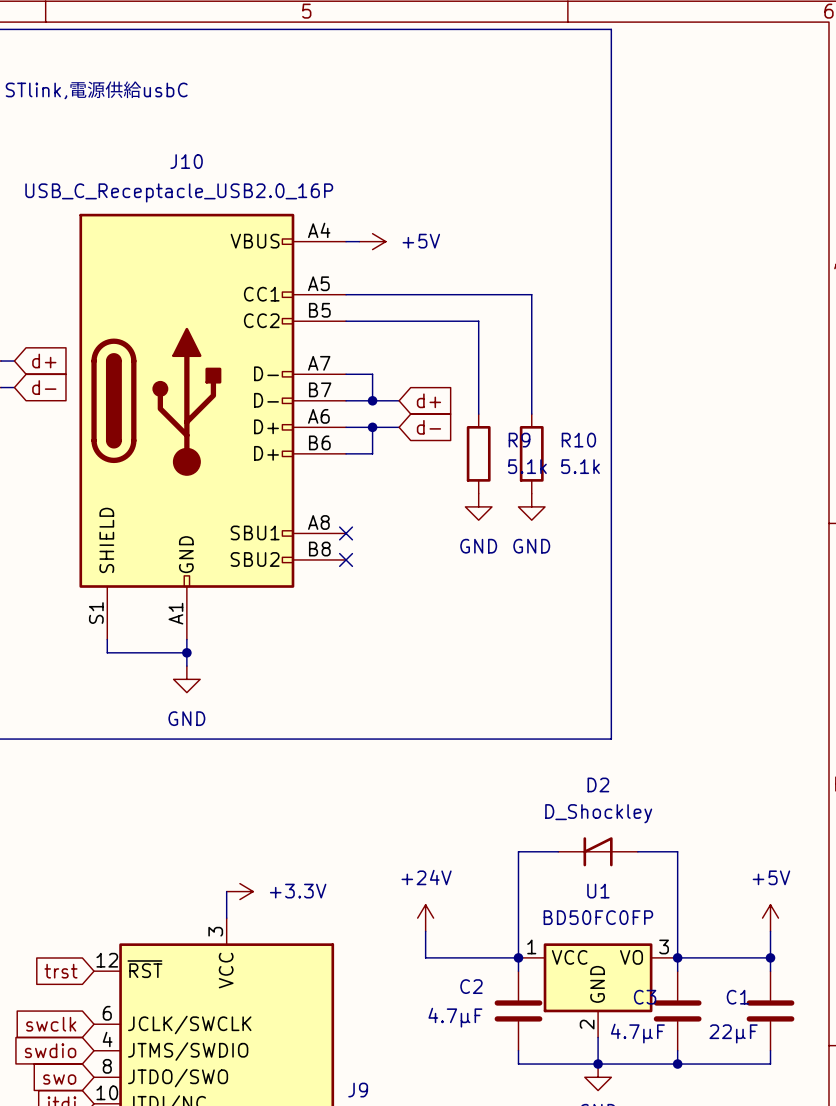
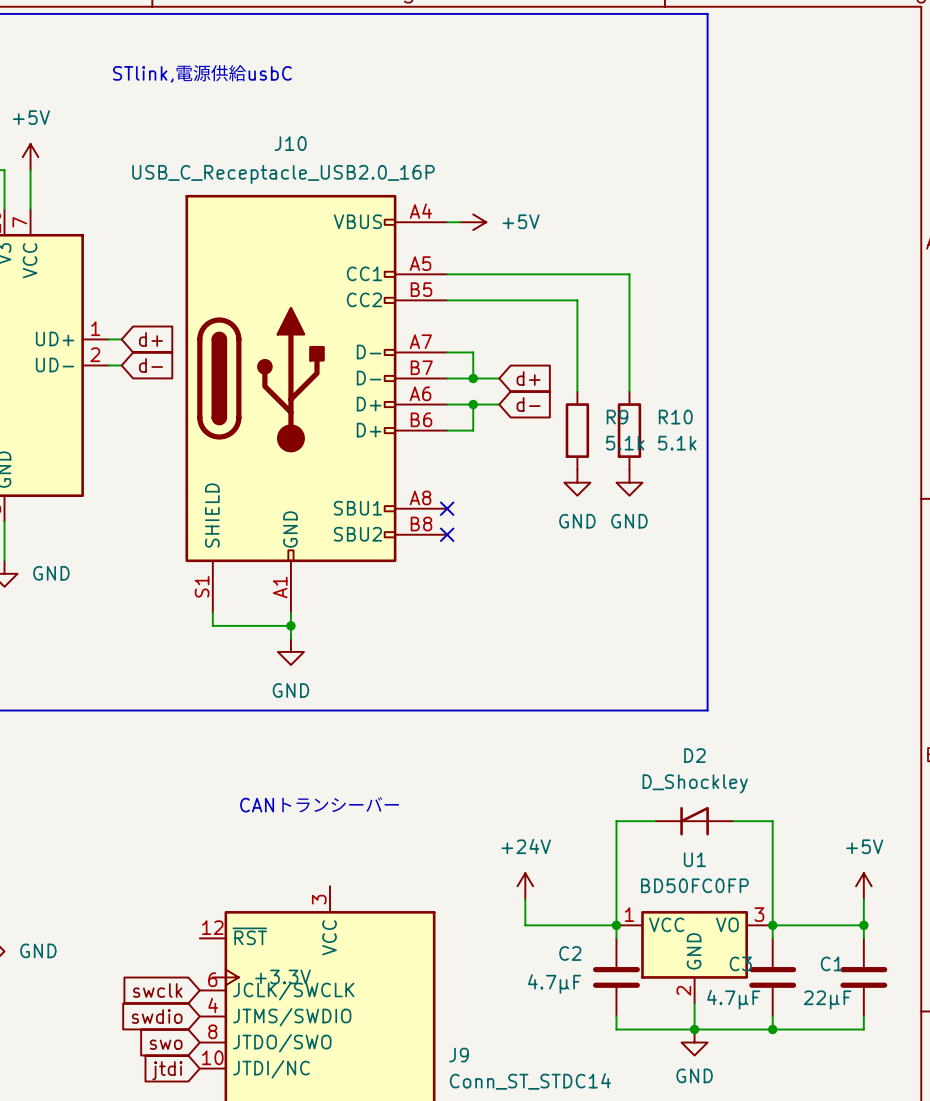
text: none -> CANトランシーバー (319, 804)
wire: (226, 891) (226, 918) -> none
power symbol position: +3.3V (239, 891) -> +3.3V (225, 977)
global label: trst (61, 971) -> none

